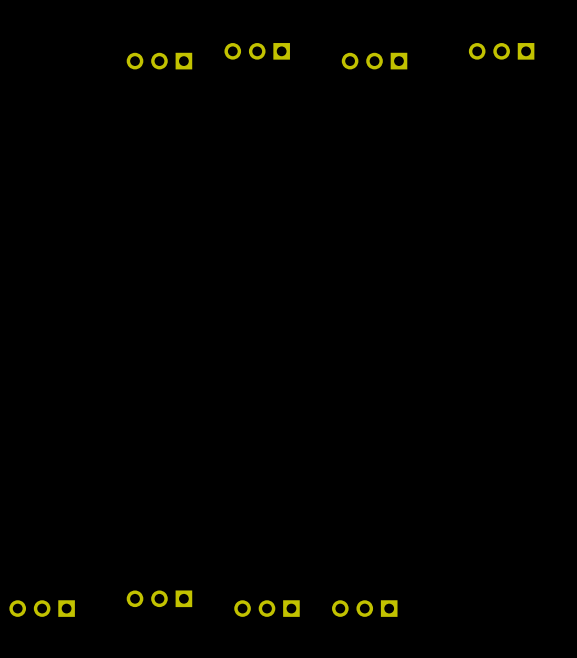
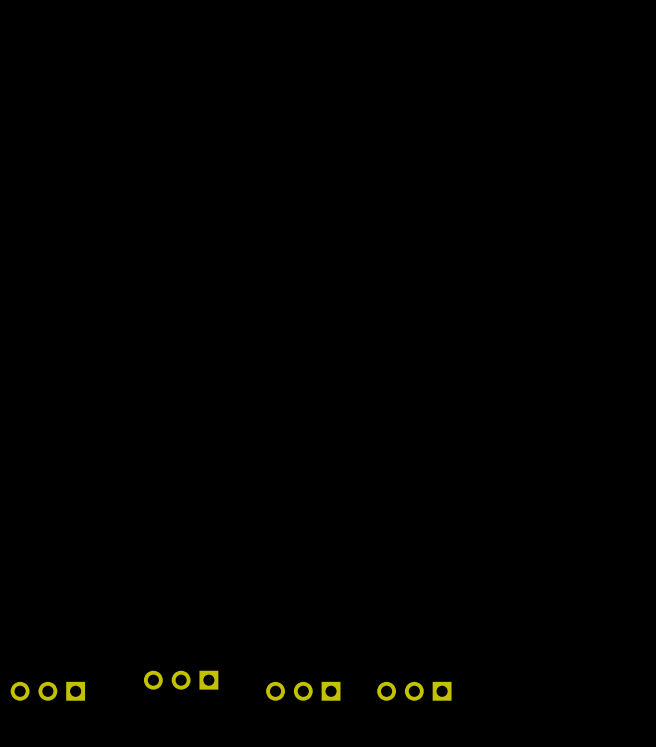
part: (257, 51) -> none
part: (501, 51) -> none
part: (159, 61) -> none
part: (374, 61) -> none

